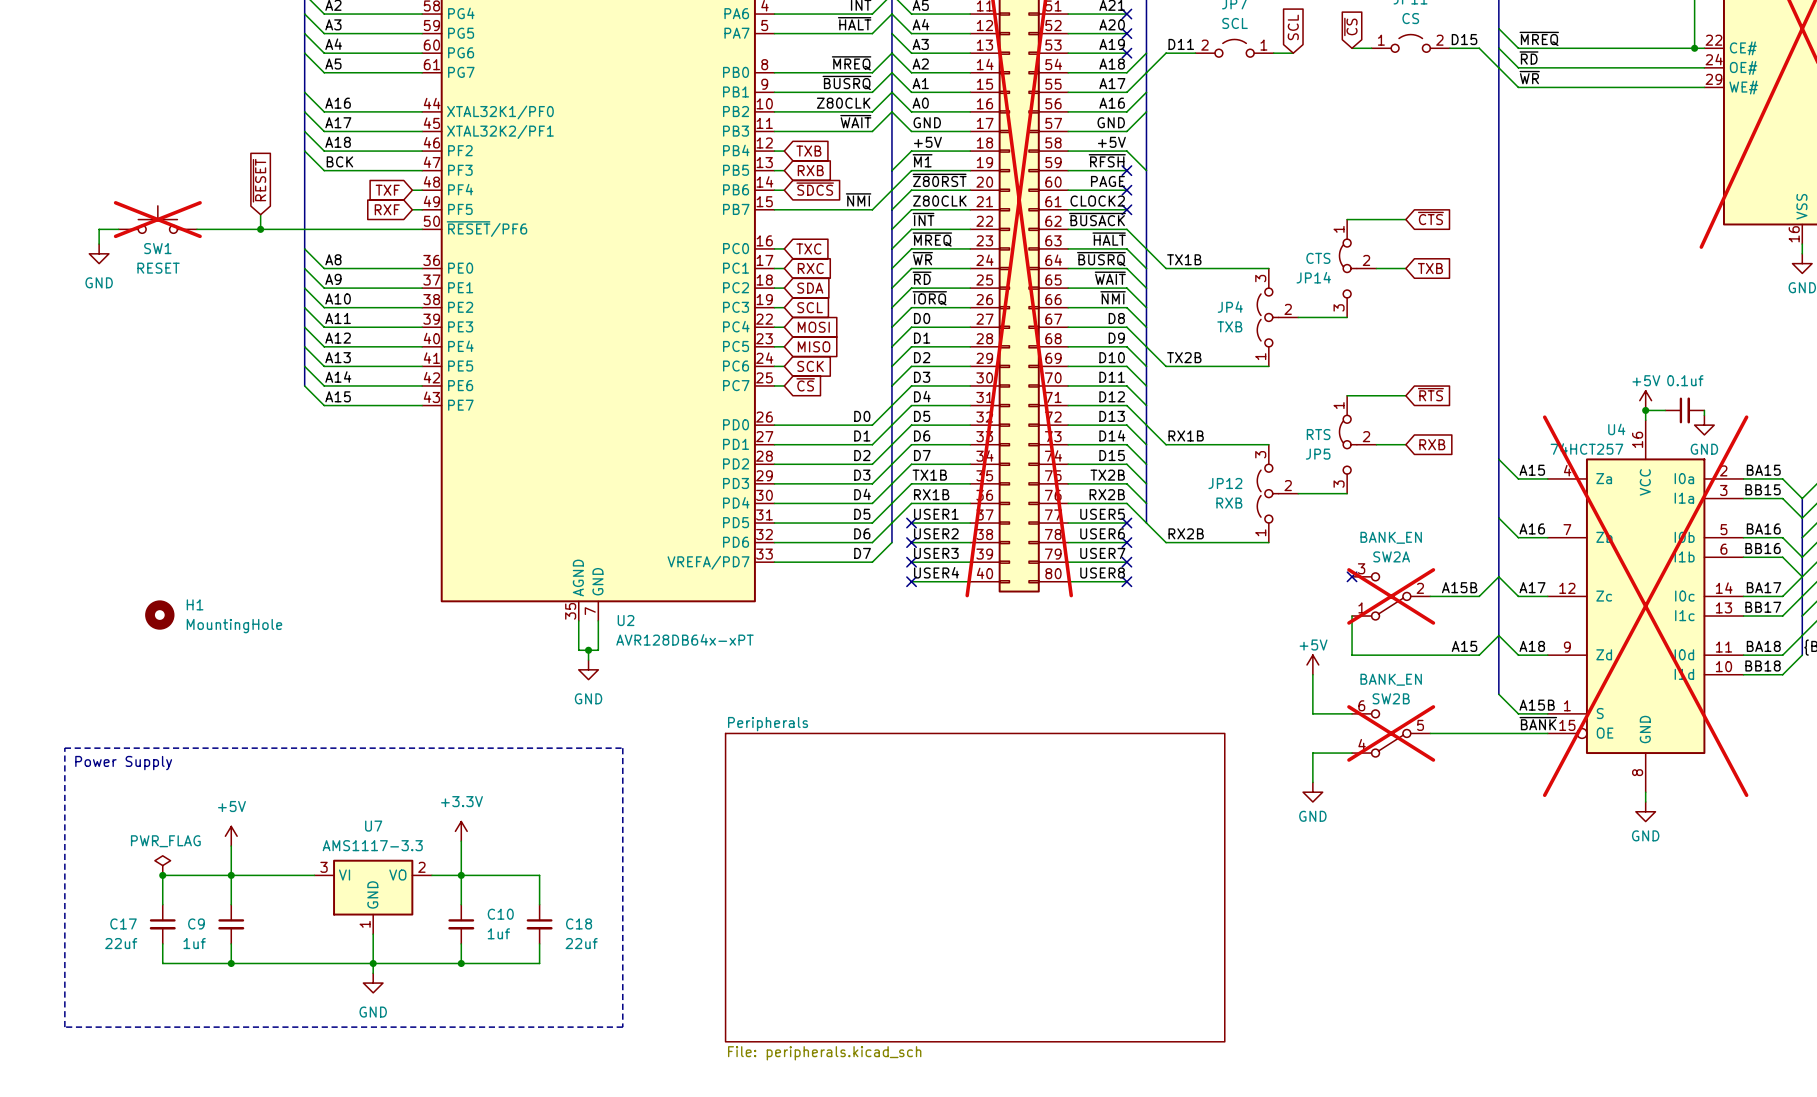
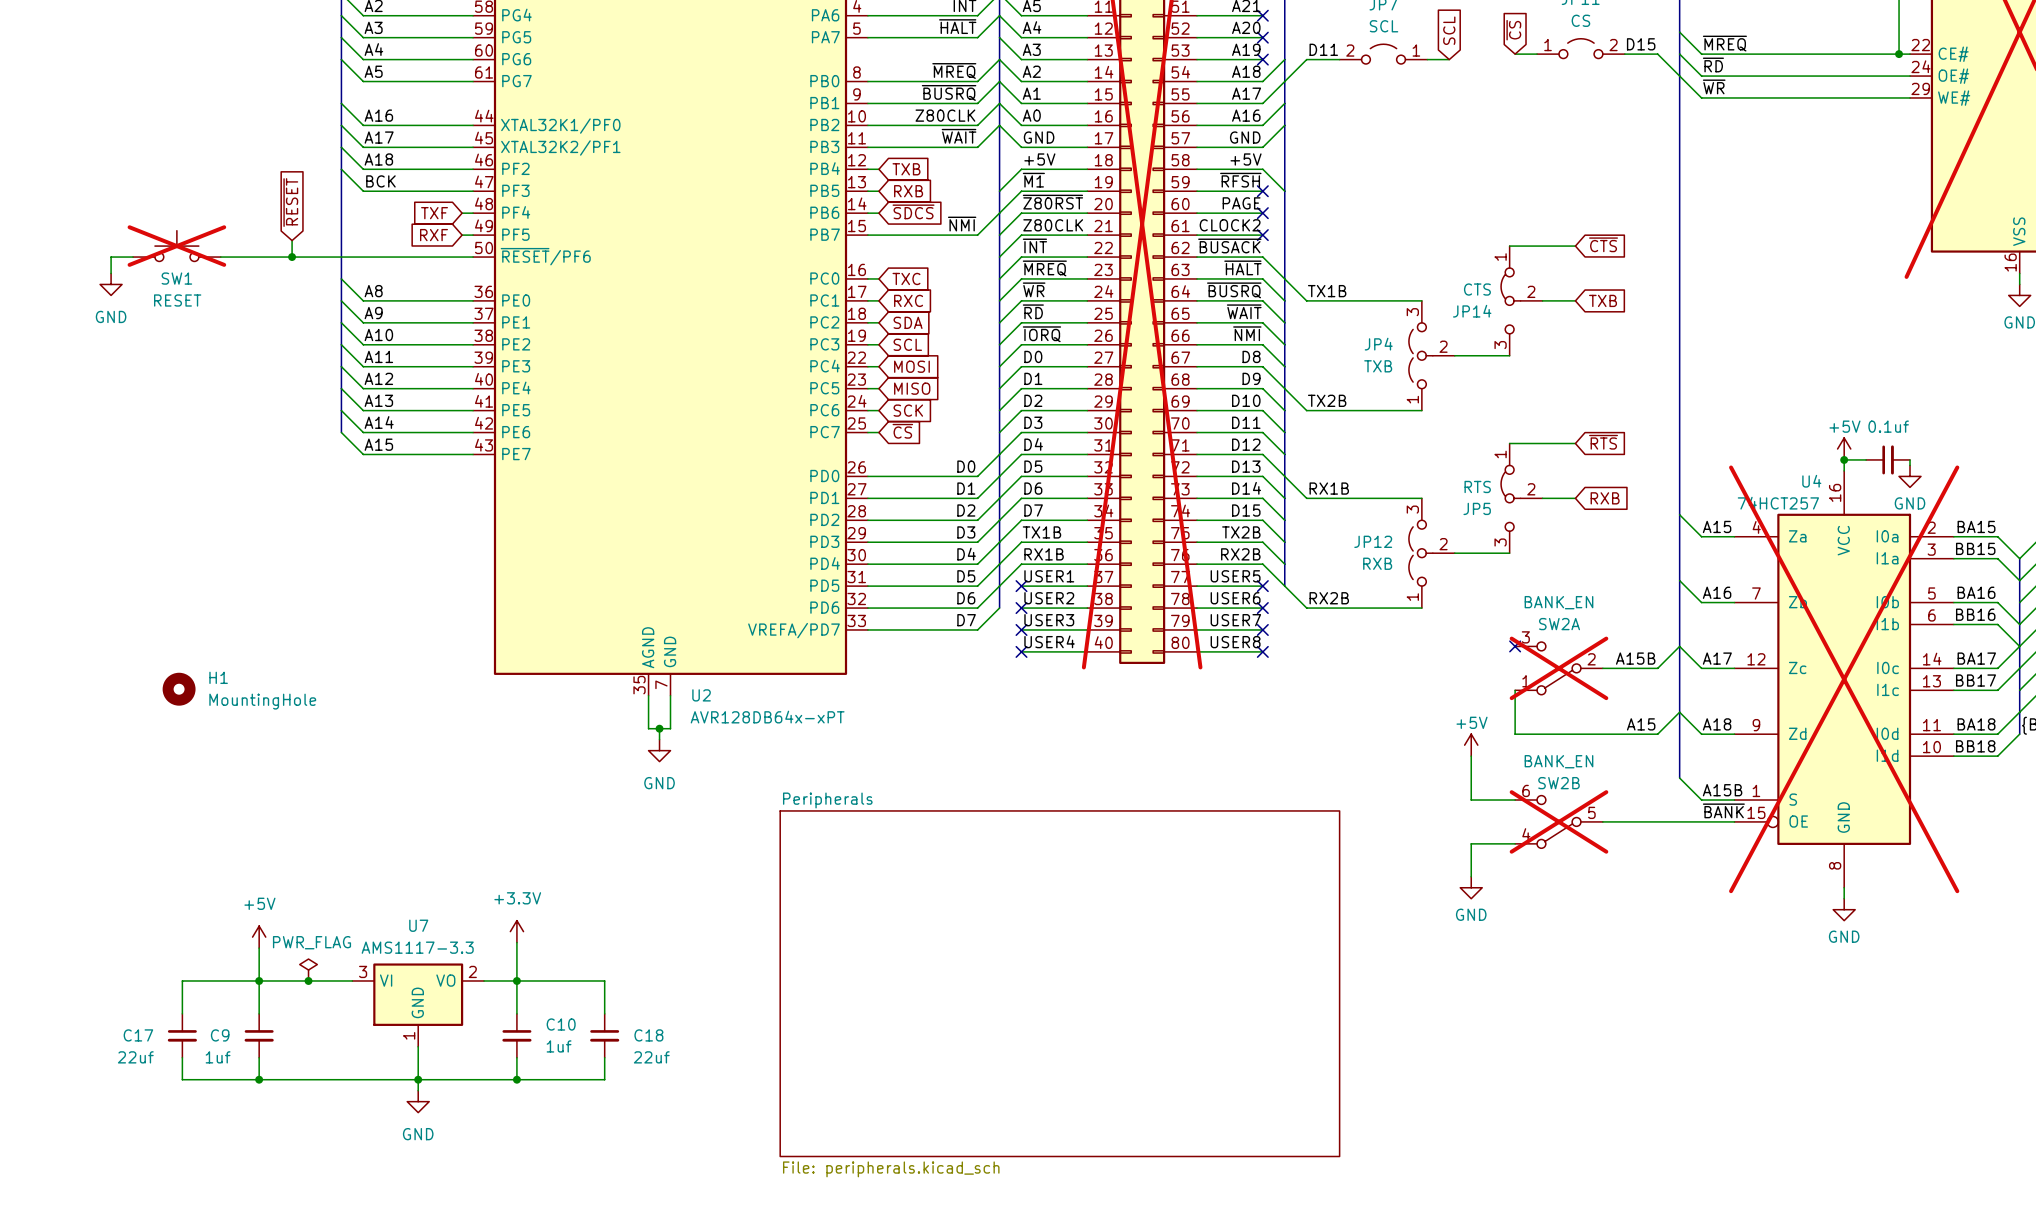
line: (64, 748) (622, 748) (622, 1027) (64, 1027) (64, 748) -> none
text: Power Supply (123, 763) -> none
power symbol position: PWR_FLAG (162, 865) -> PWR_FLAG (308, 970)
junction: (162, 875) -> none
junction: none -> (308, 980)
sheet Peripherals position: (975, 887) -> (1059, 983)

